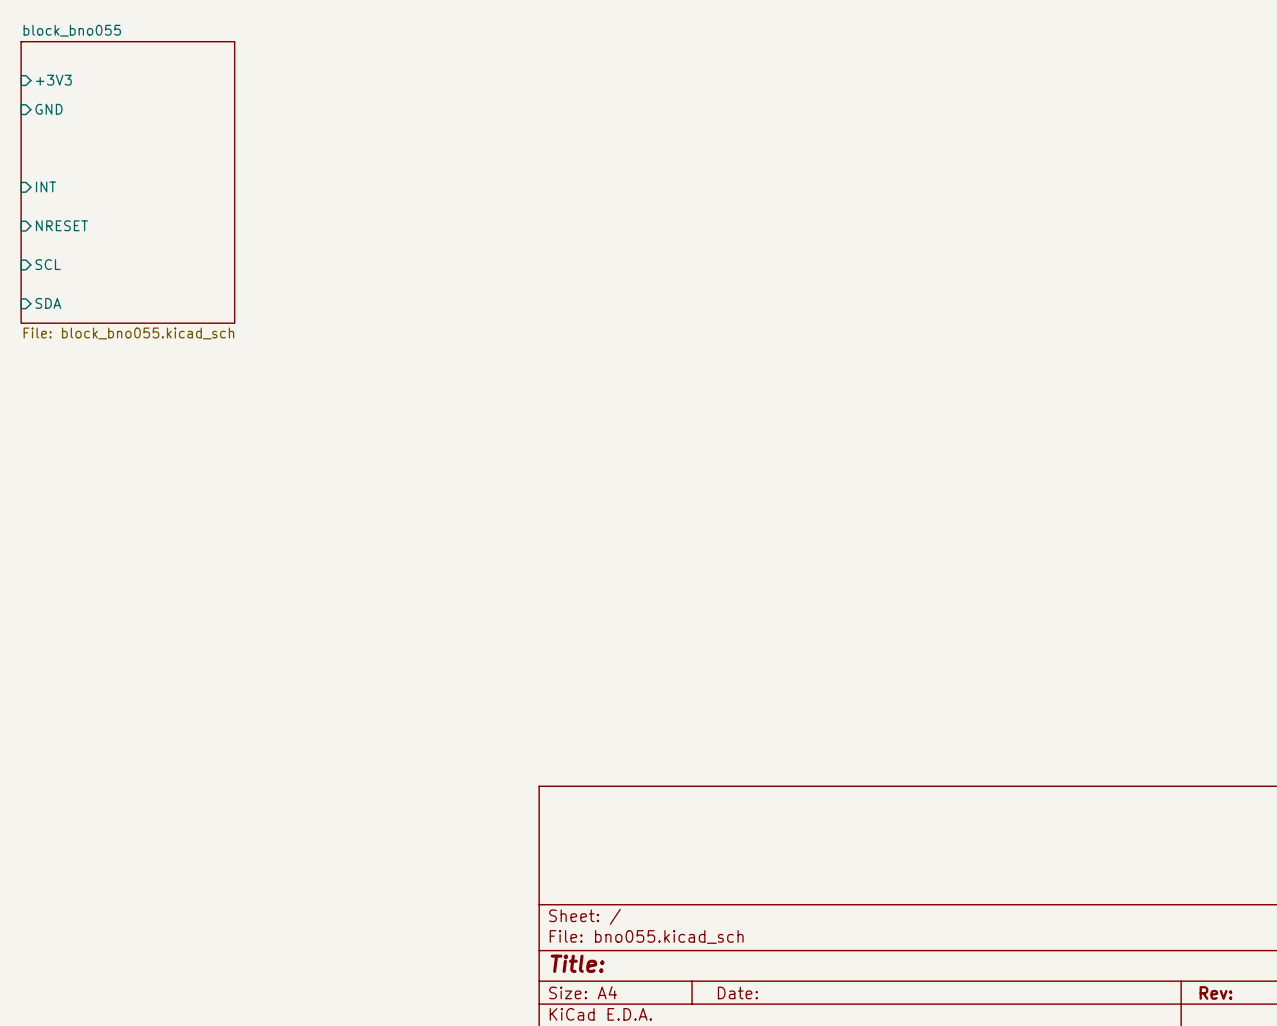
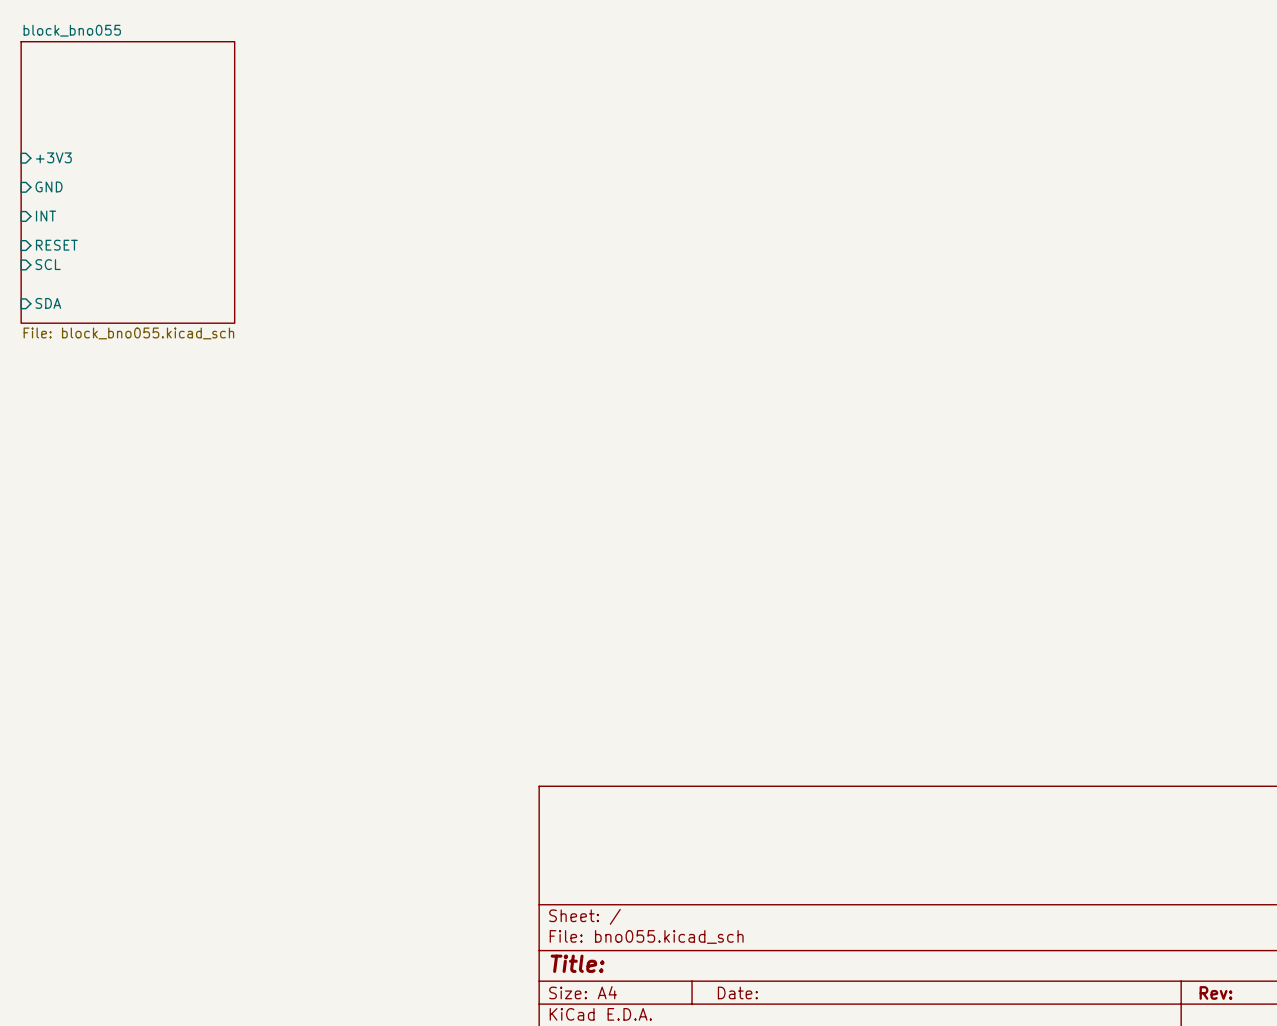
sheet pin position: +3V3 (53, 80) -> +3V3 (53, 157)
sheet pin: GND (49, 109) -> none
sheet pin: INT (46, 186) -> GND (49, 186)
sheet pin: none -> INT (46, 216)
sheet pin: NRESET (61, 225) -> RESET (56, 245)

